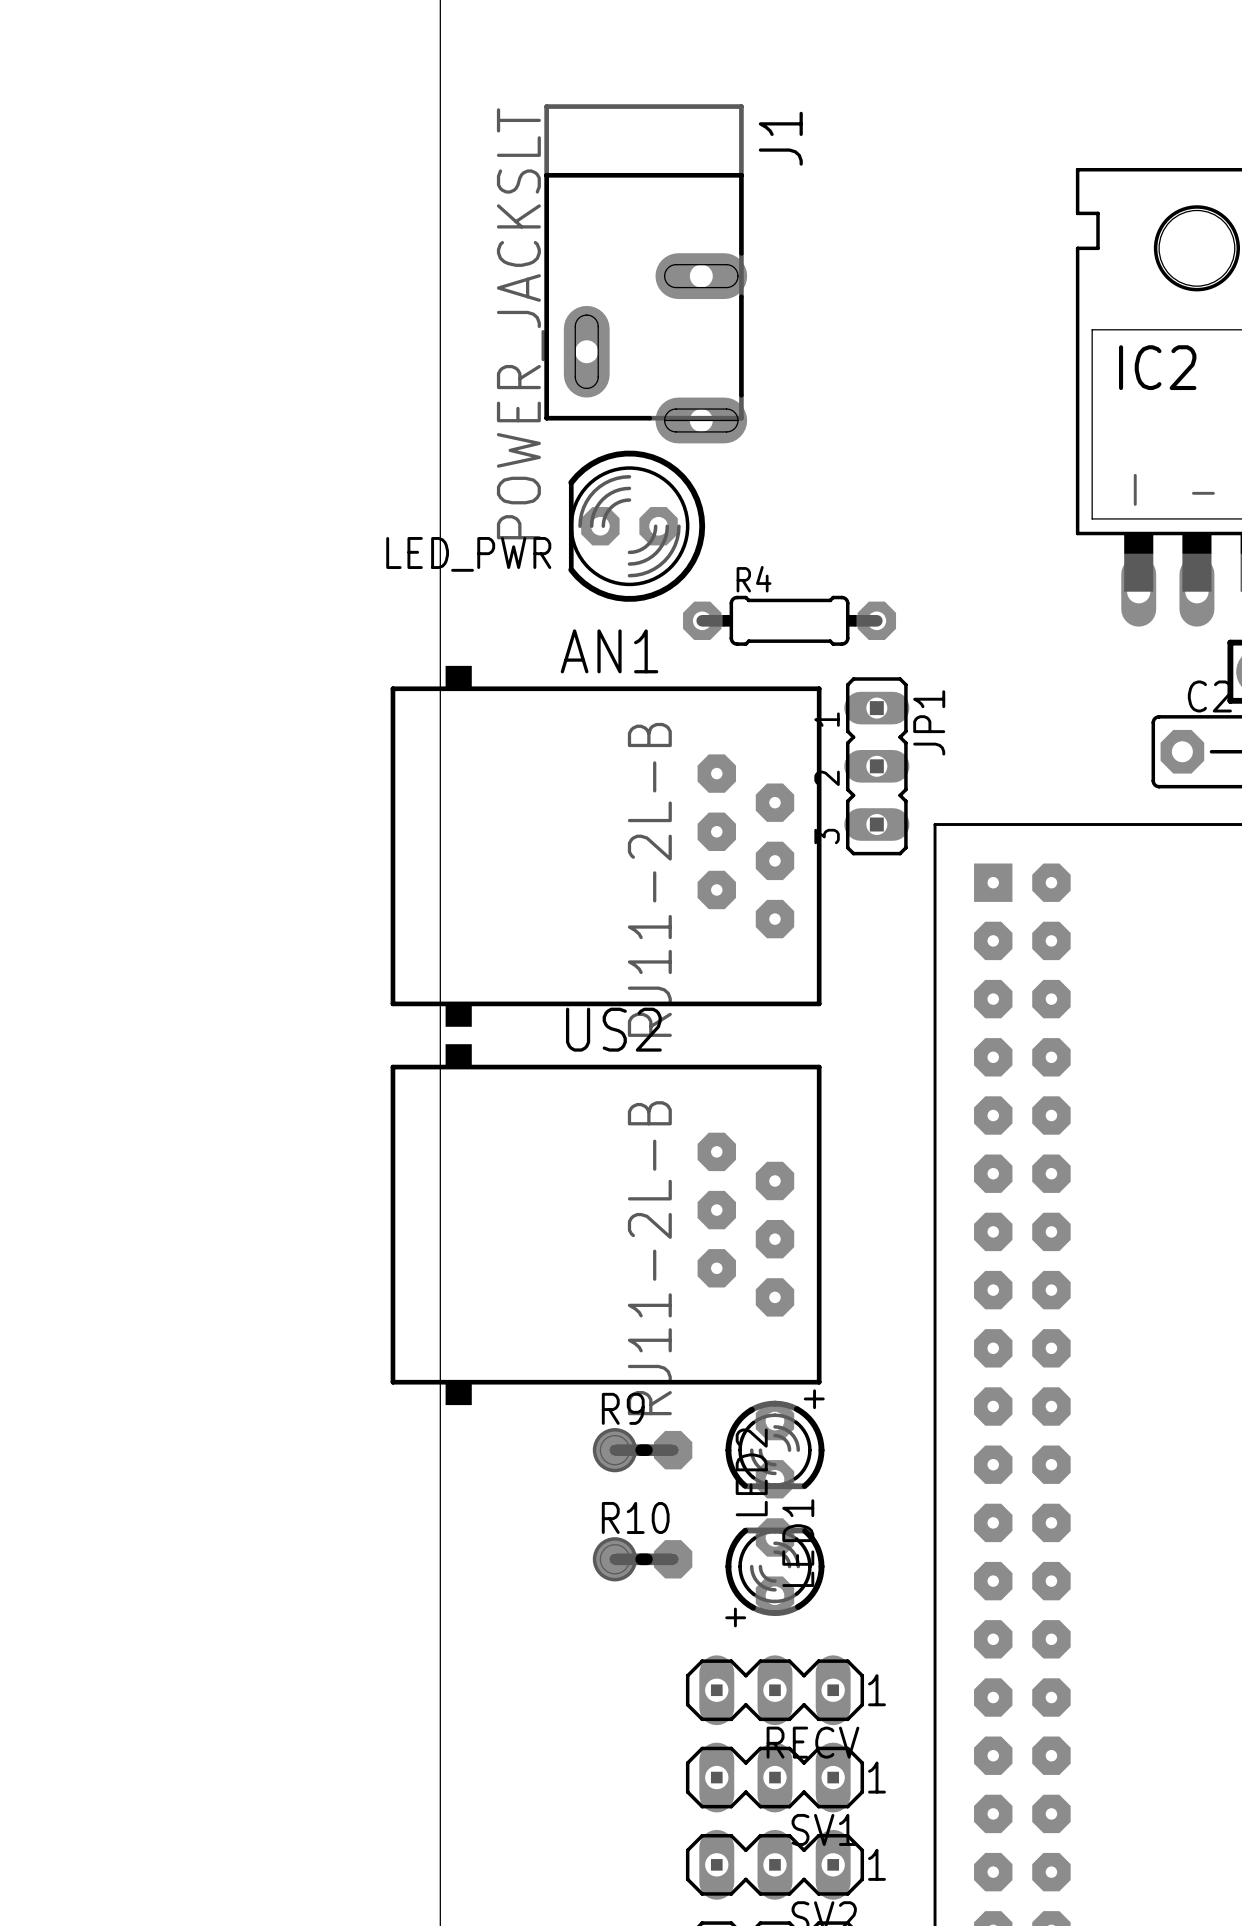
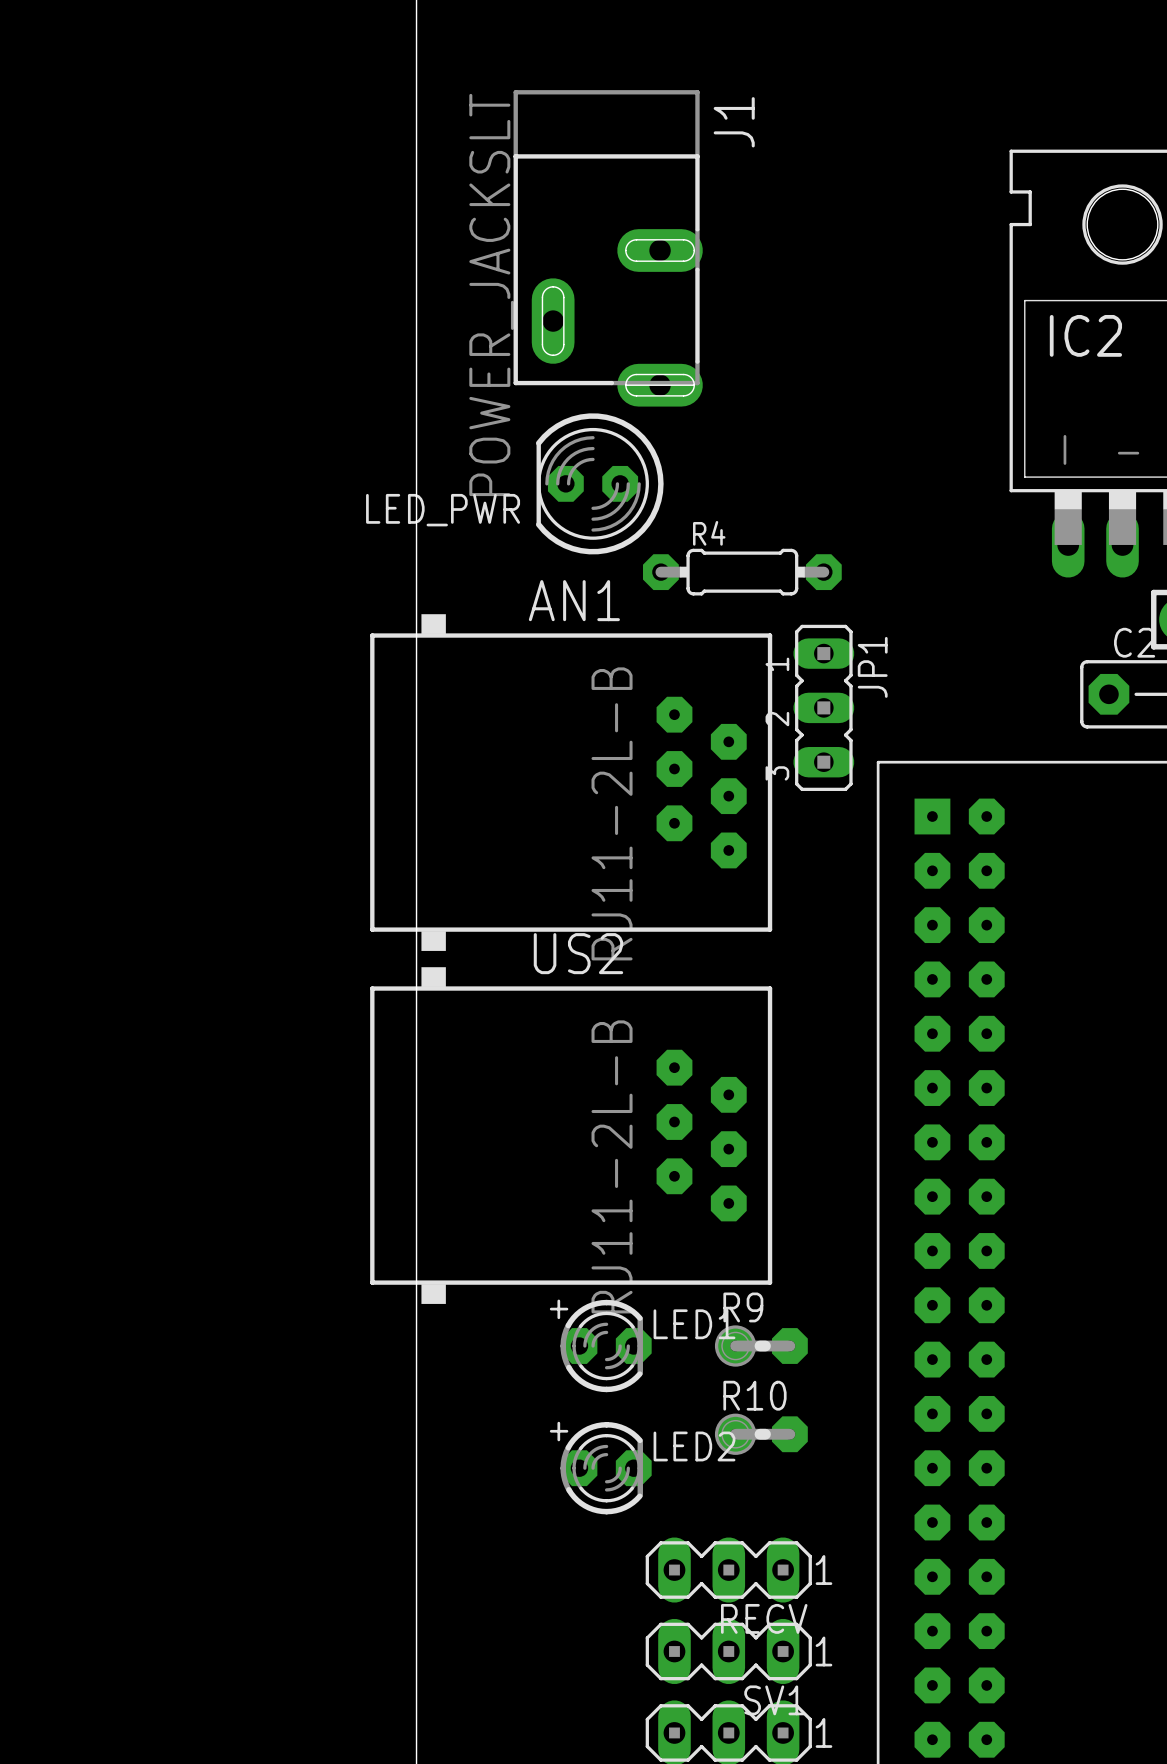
LED1 rotation: 0° (775, 1443) -> 90° counterclockwise (600, 1345)
LED1 position: (775, 1443) -> (600, 1345)
R9 position: (642, 1450) -> (761, 1346)
R10 position: (642, 1559) -> (761, 1434)
LED2 rotation: 0° (774, 1572) -> 90° clockwise (600, 1468)
LED2 position: (774, 1572) -> (600, 1468)

